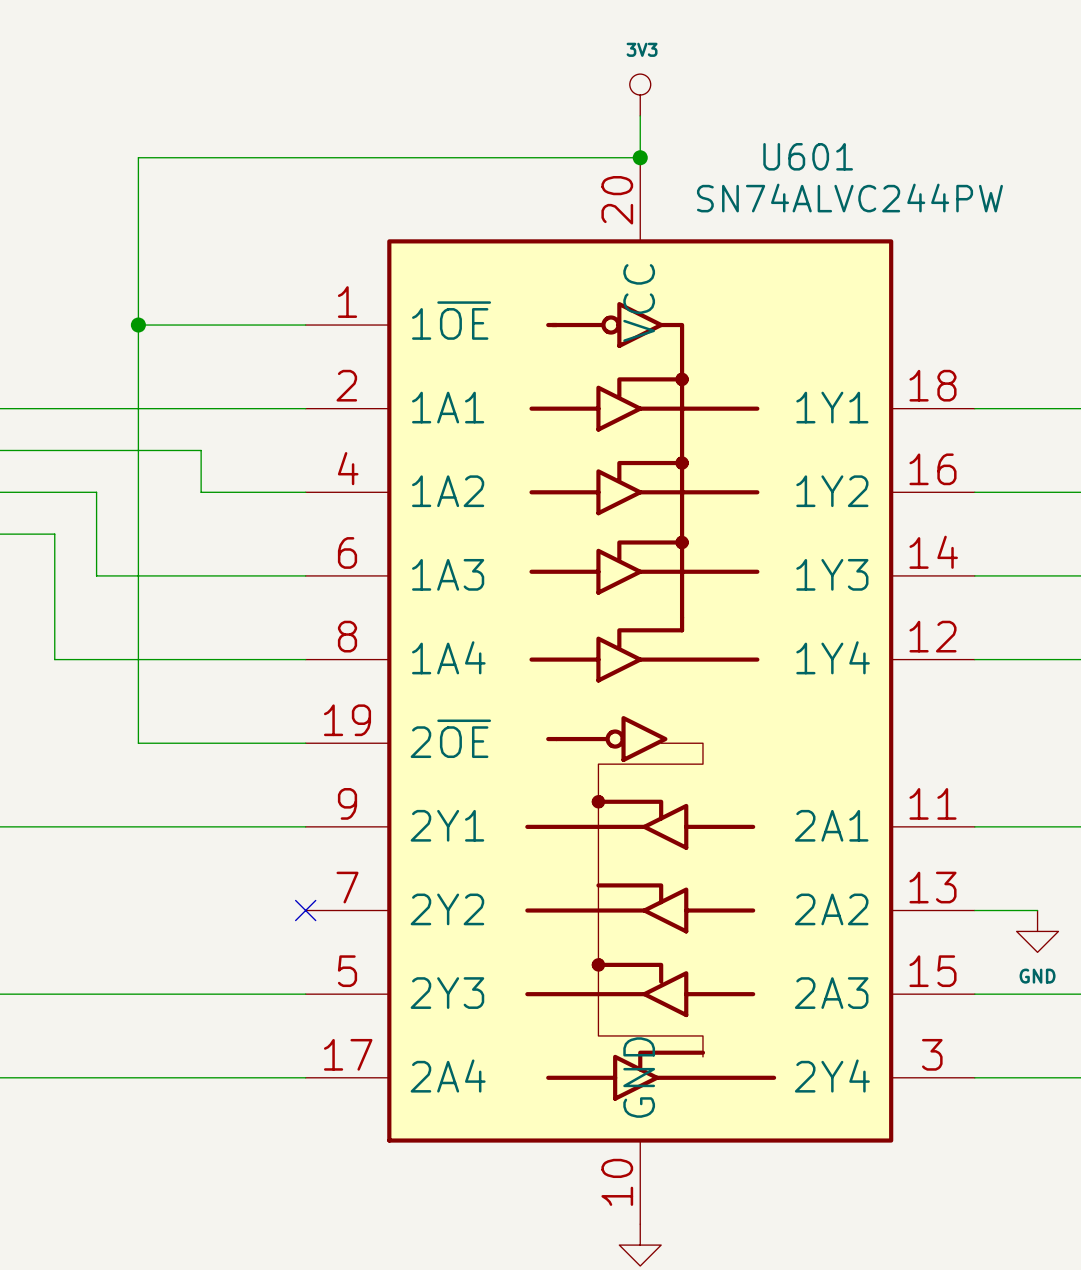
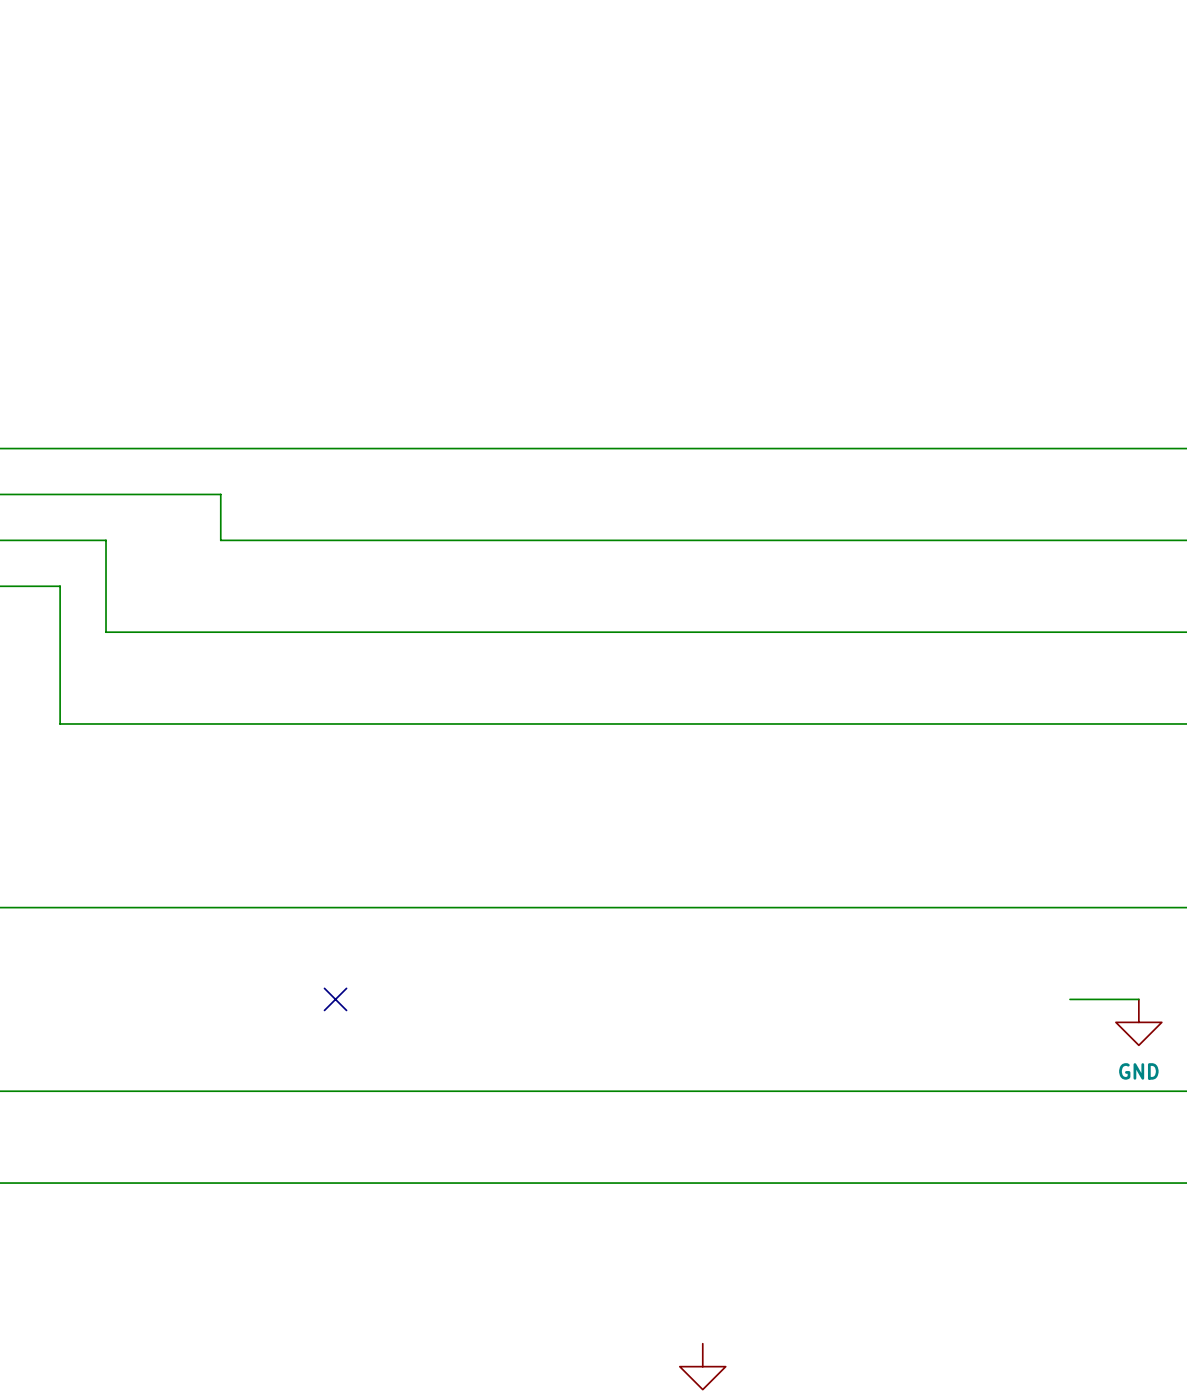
power symbol: 3V3 (640, 95) -> none
wire: (640, 115) (640, 157) (138, 157) (138, 743) (305, 743) -> none
junction: (640, 157) -> none
wire: (138, 325) (305, 325) -> none
junction: (138, 325) -> none
U601: SN74ALVC244PW (640, 690) -> none

